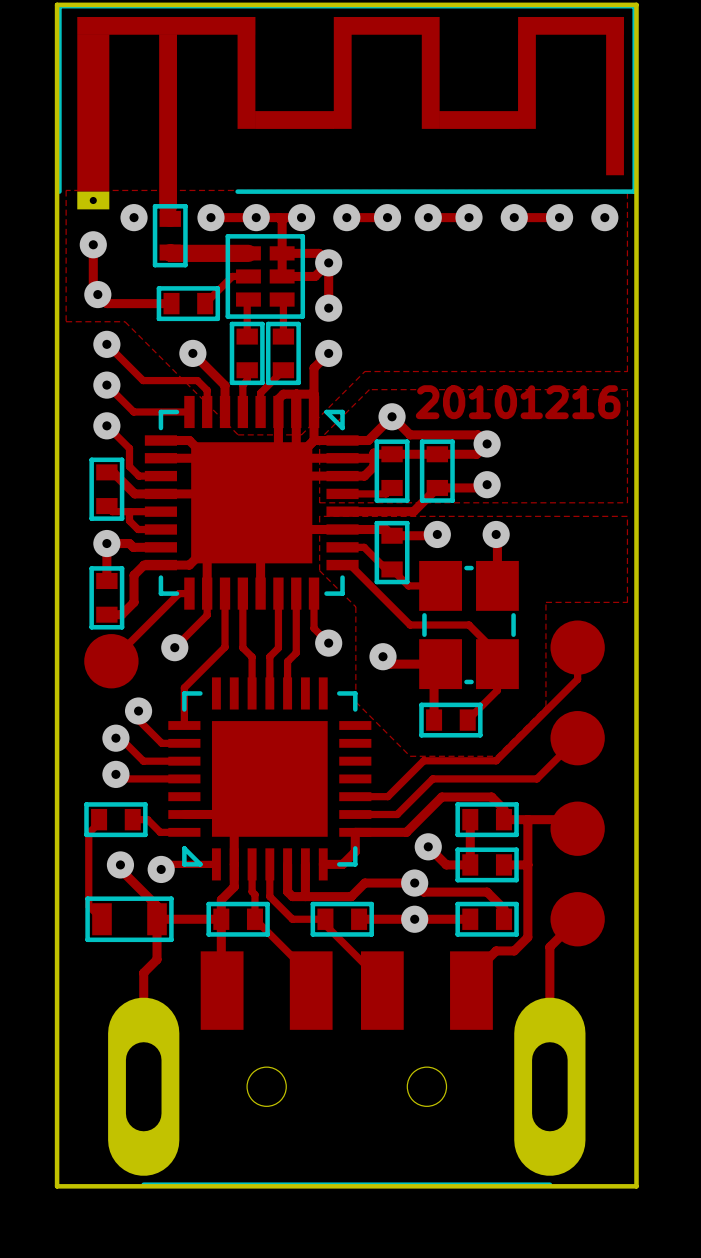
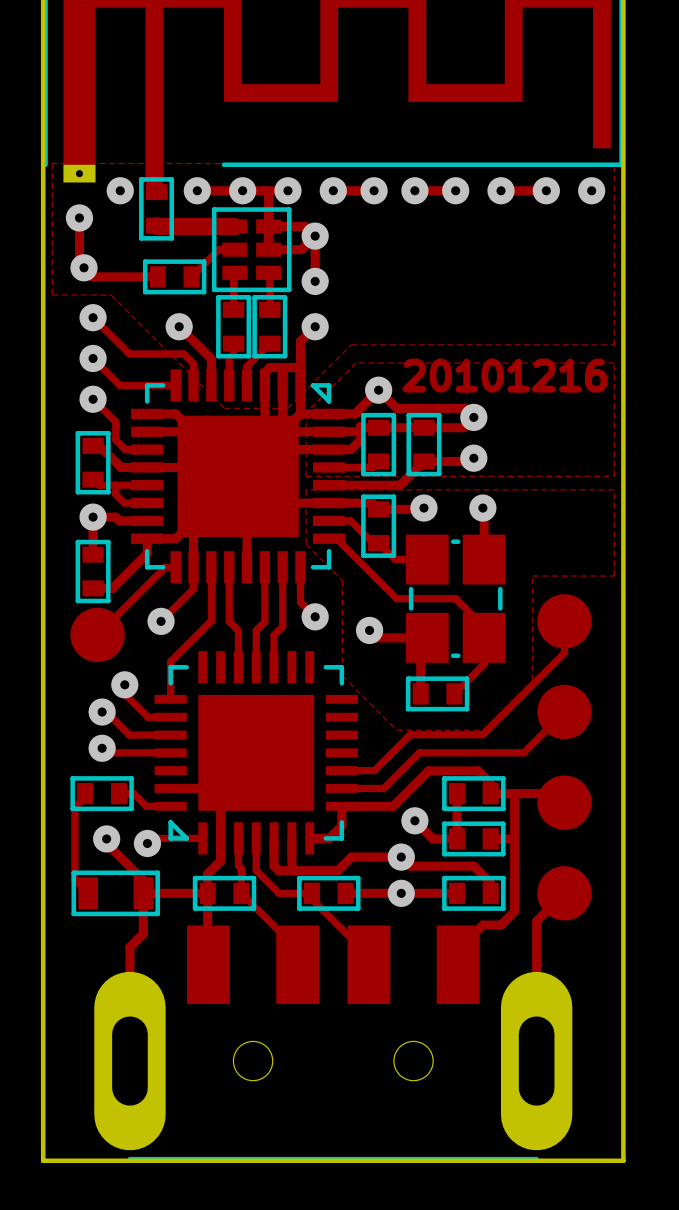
track: (160, 565) (144, 565) (134, 575) (134, 602) (121, 614) -> (147, 538) (147, 553) (112, 588) (107, 588)

